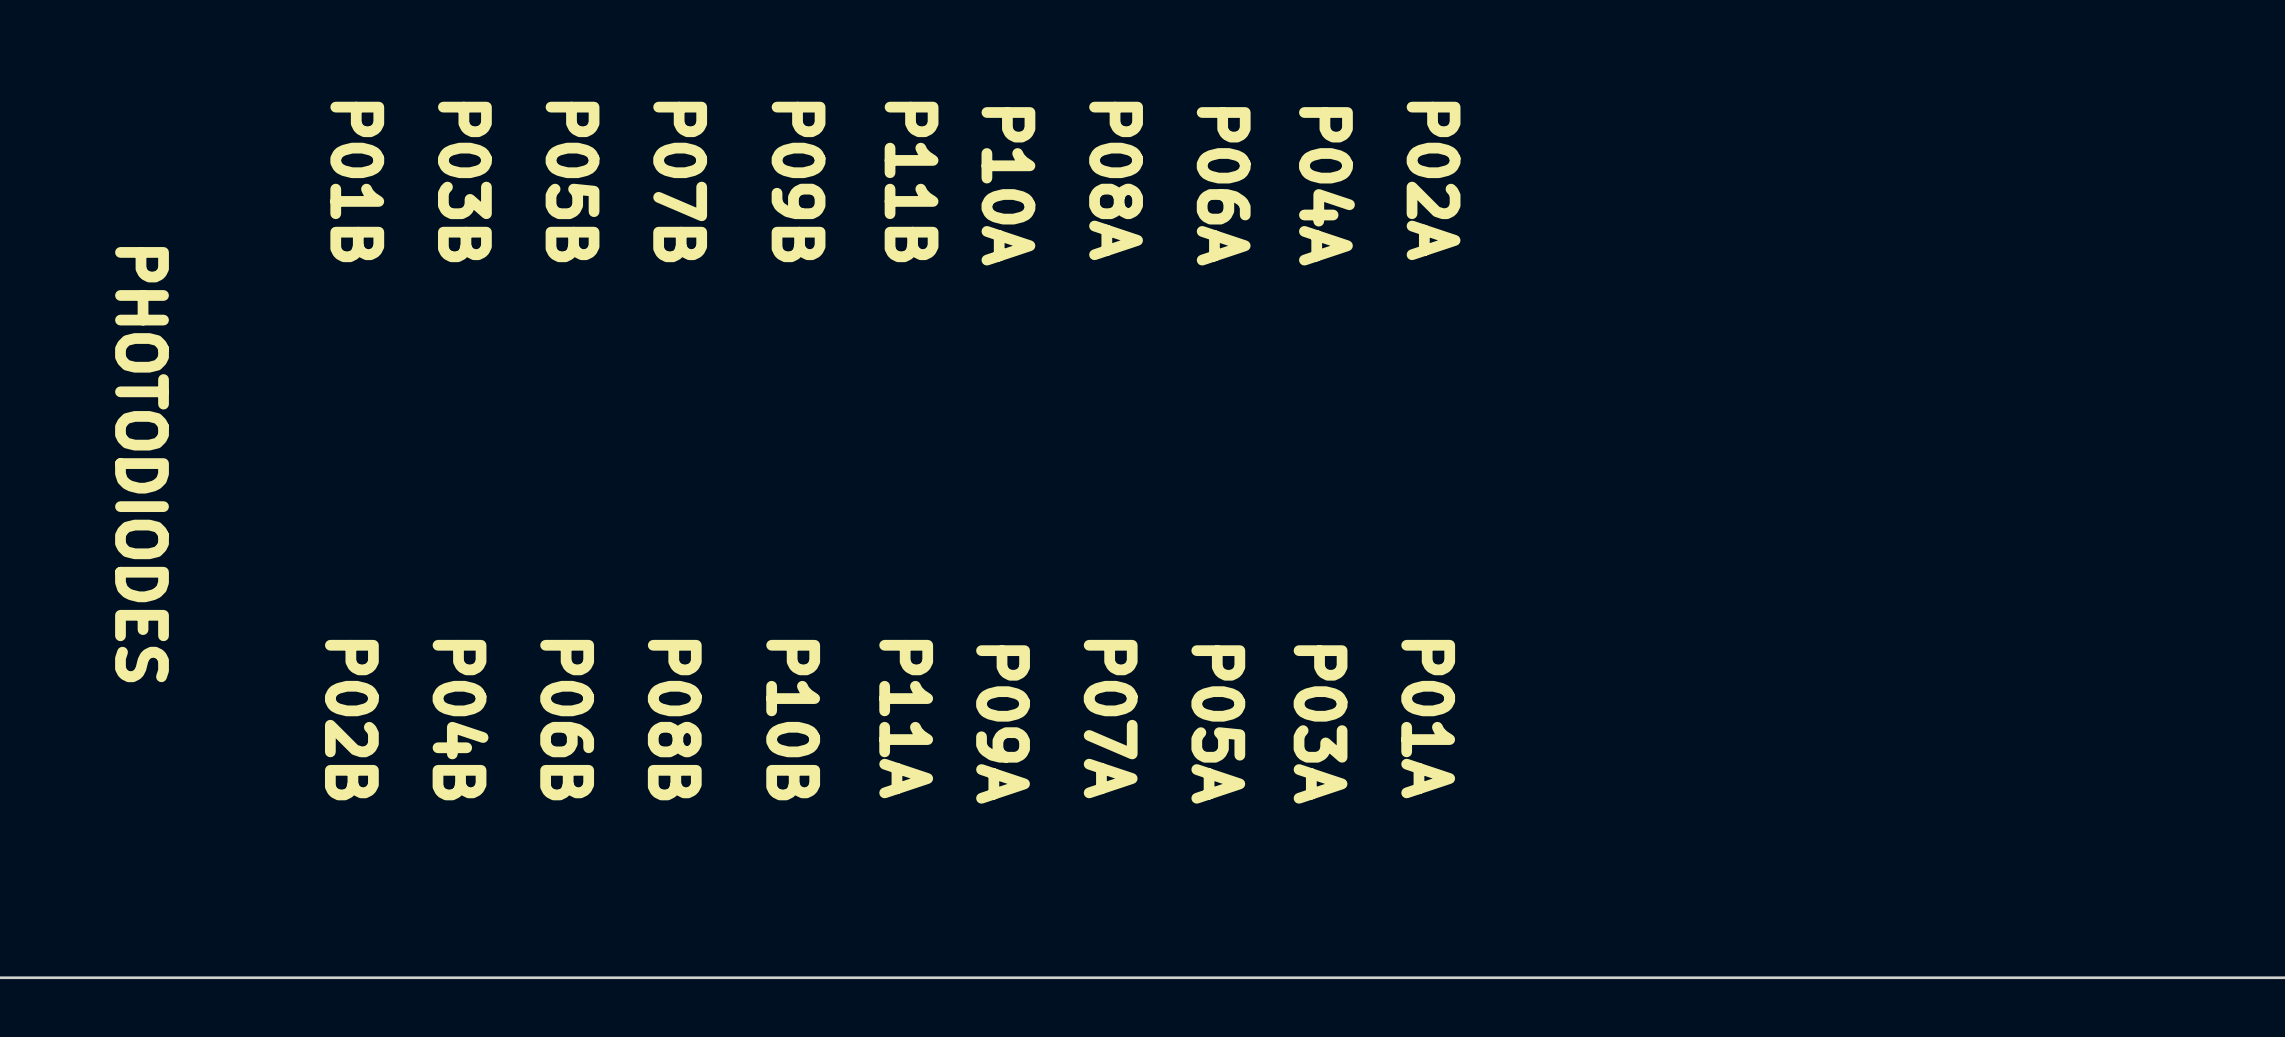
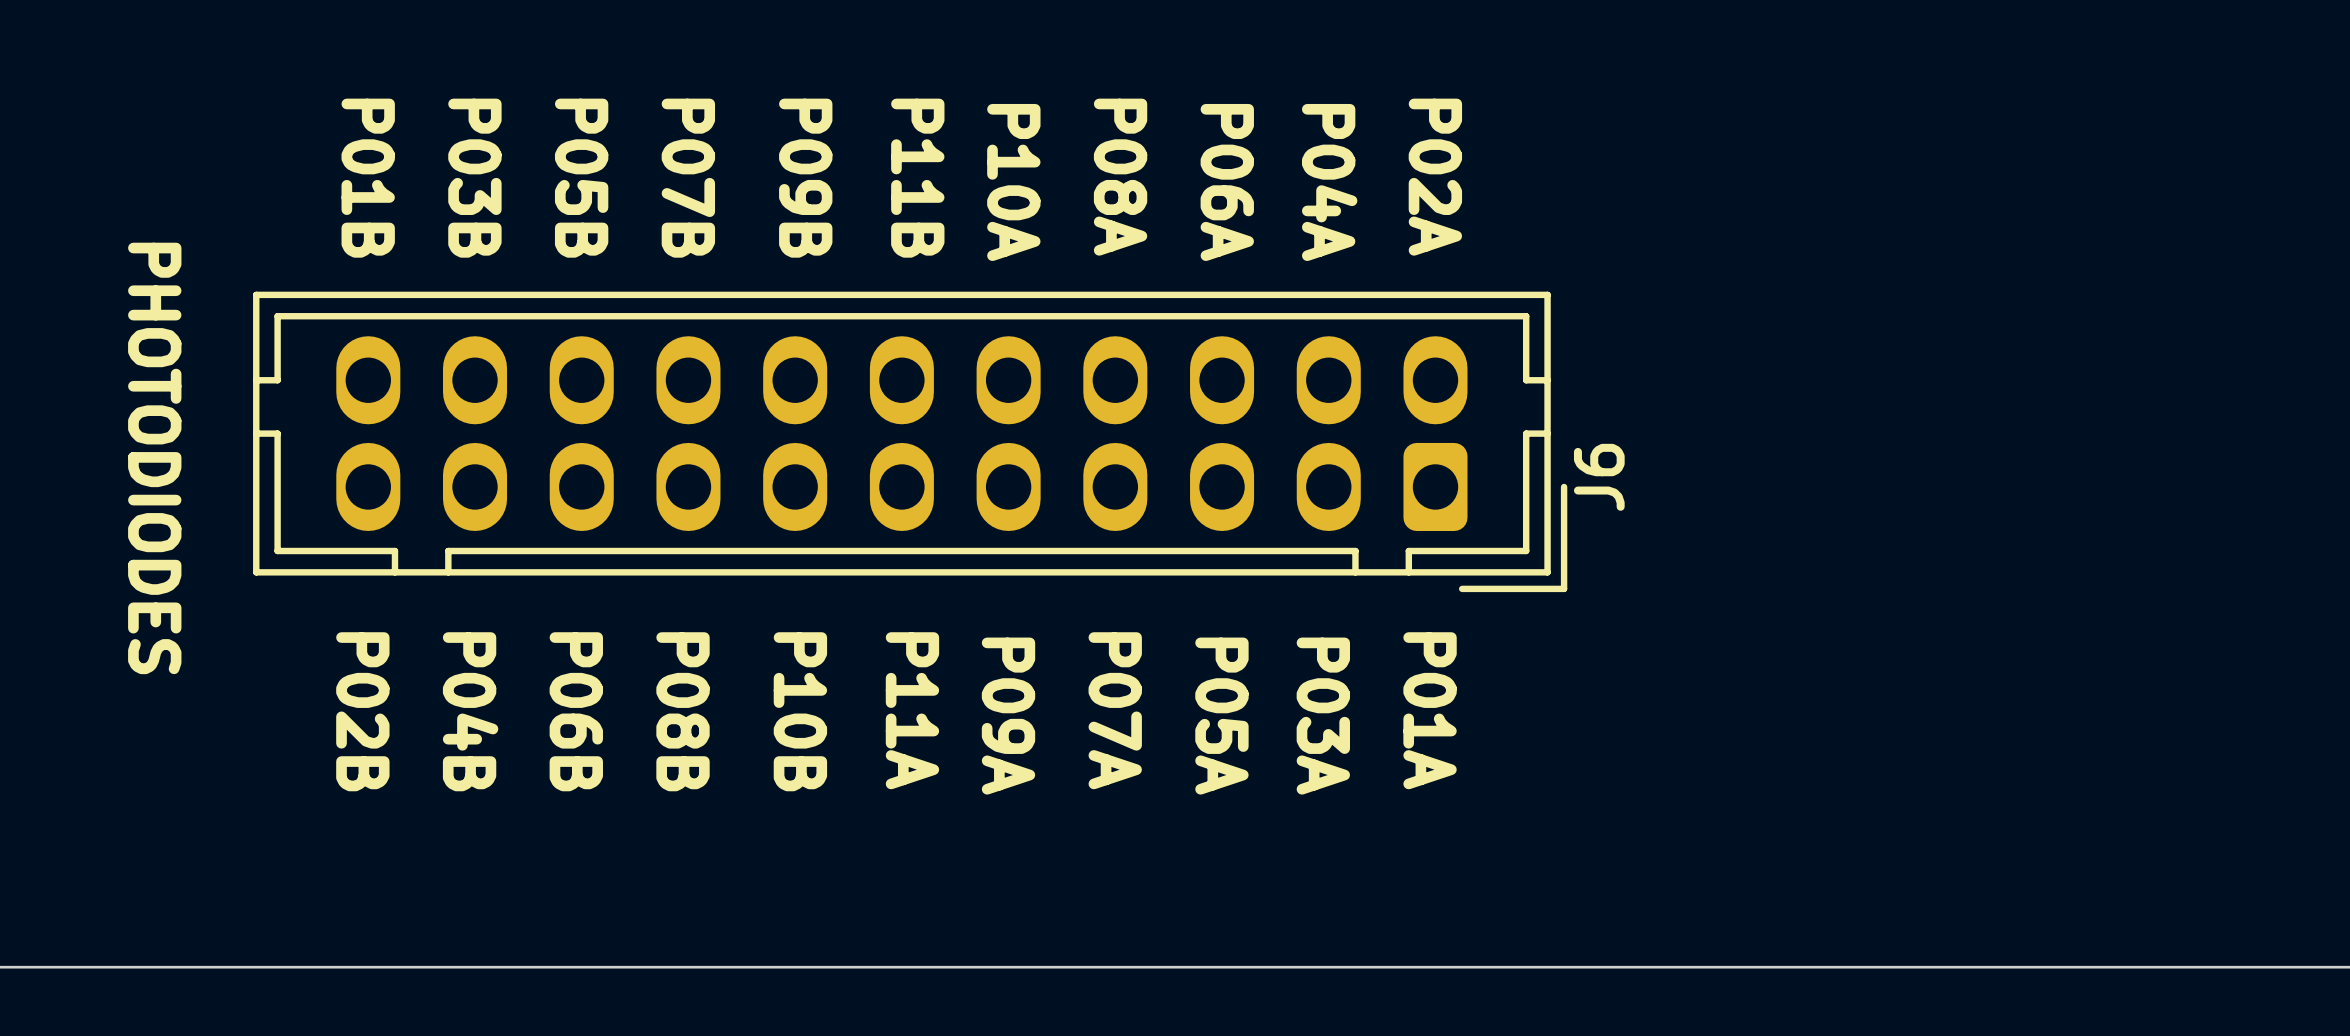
J6: none -> (910, 441)

